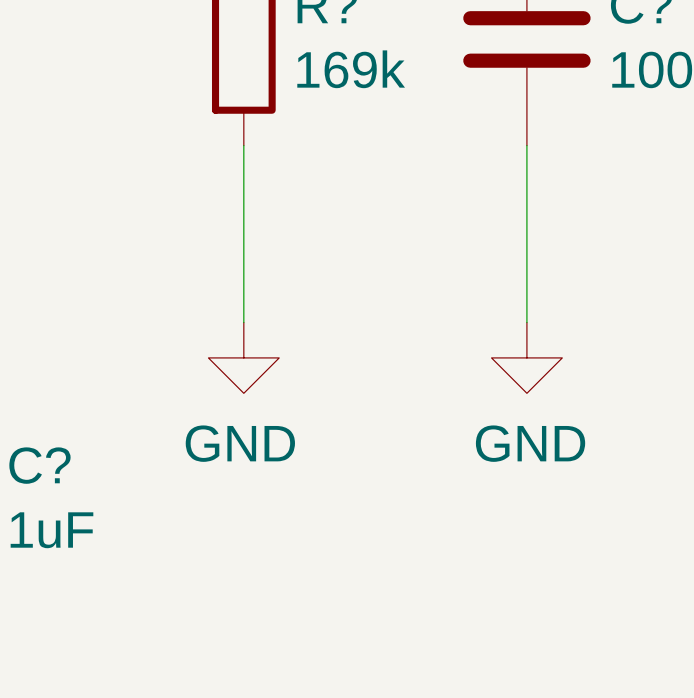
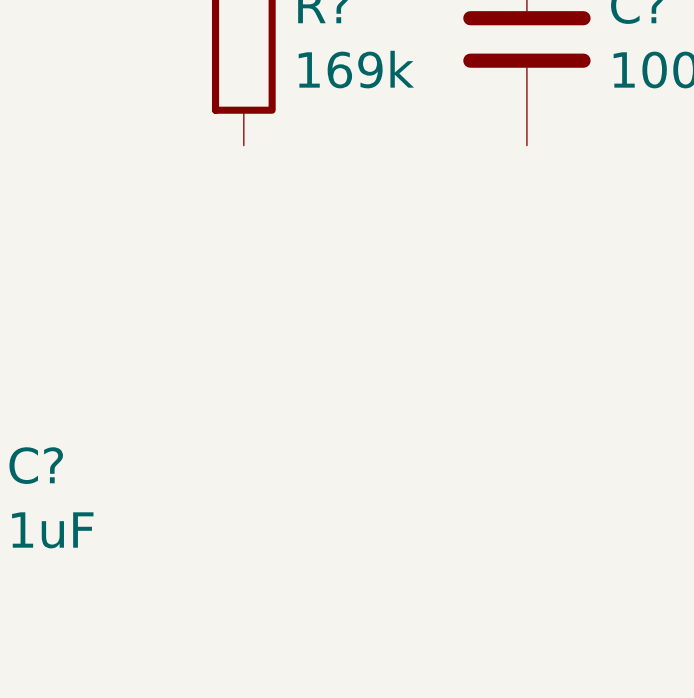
wire: (243, 145) (243, 322) -> none
wire: (526, 145) (526, 322) -> none
power symbol: GND (243, 357) -> none
power symbol: GND (526, 357) -> none

